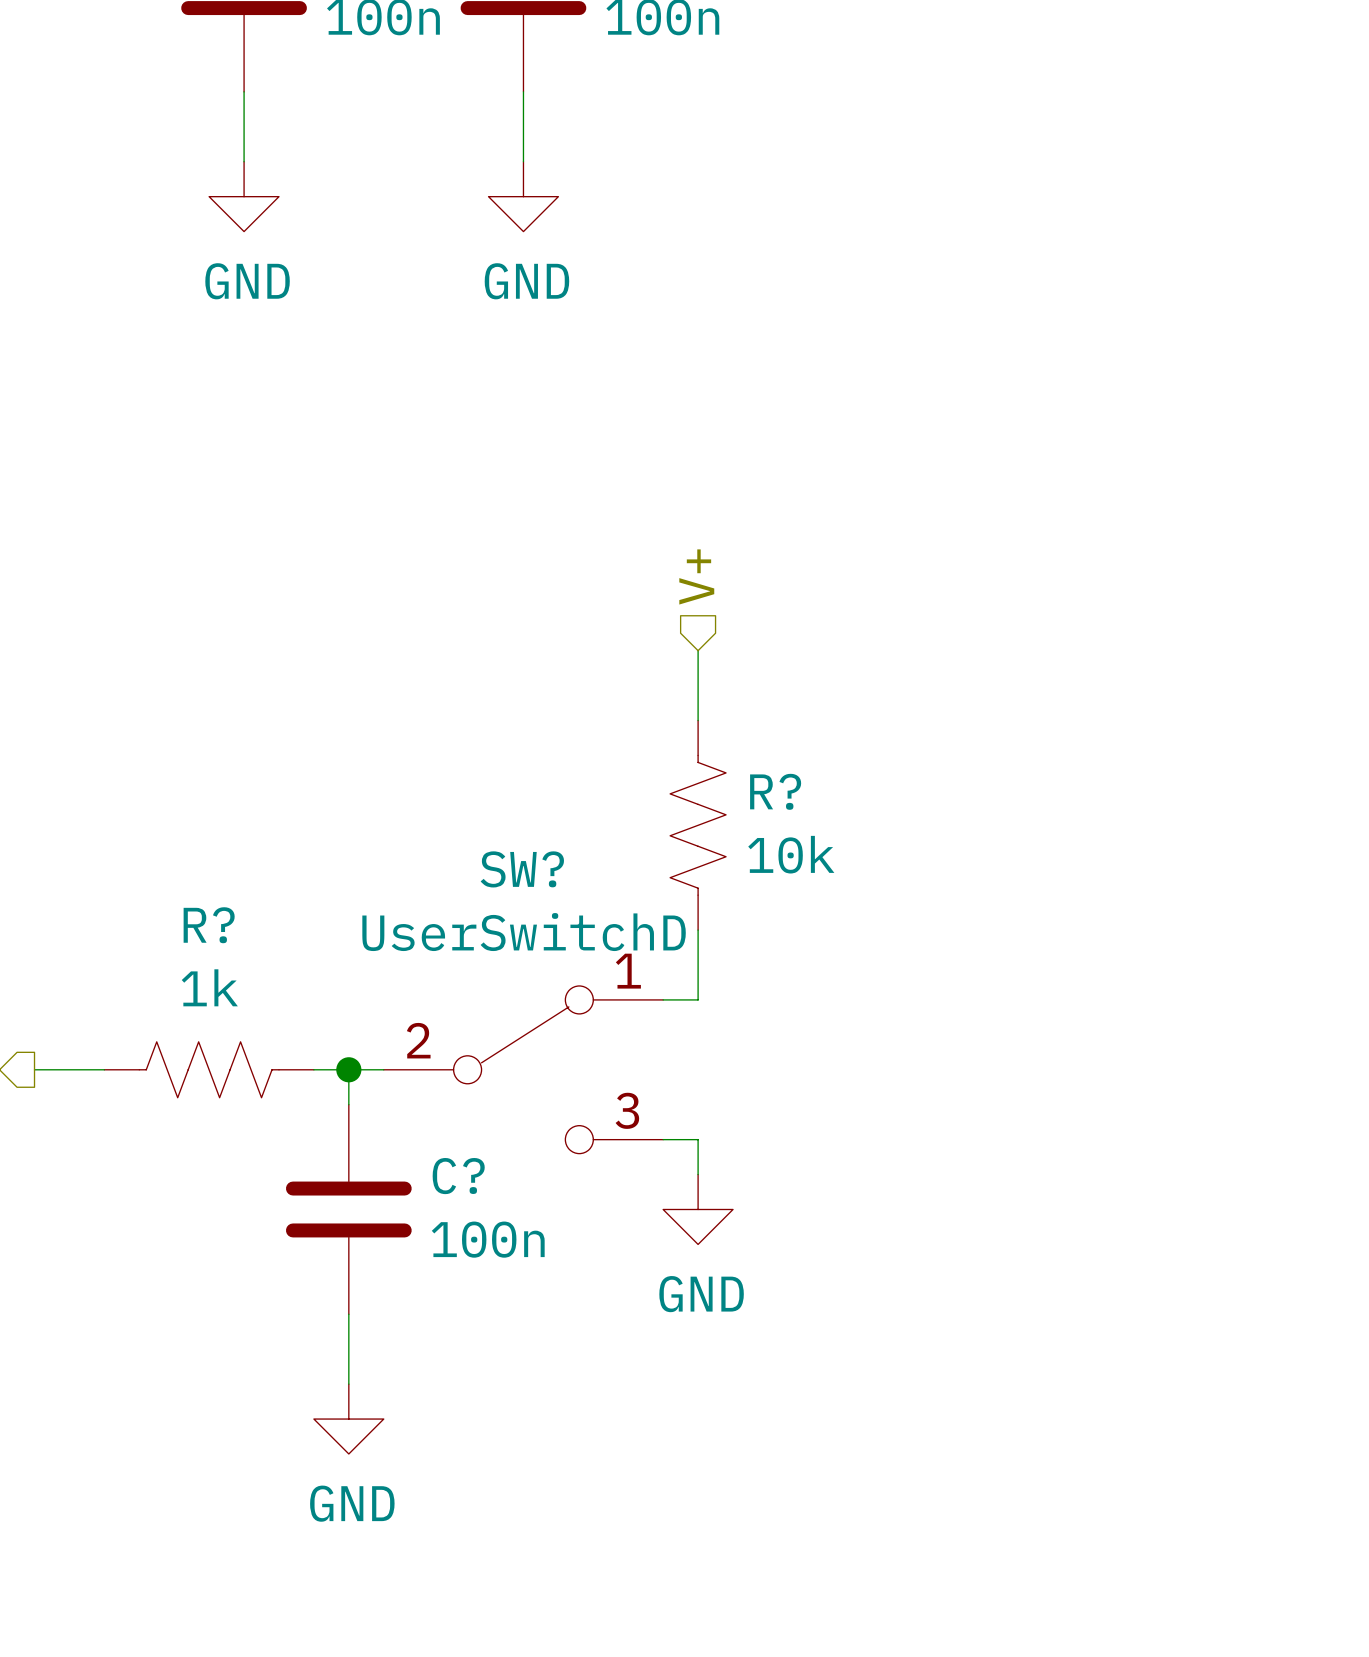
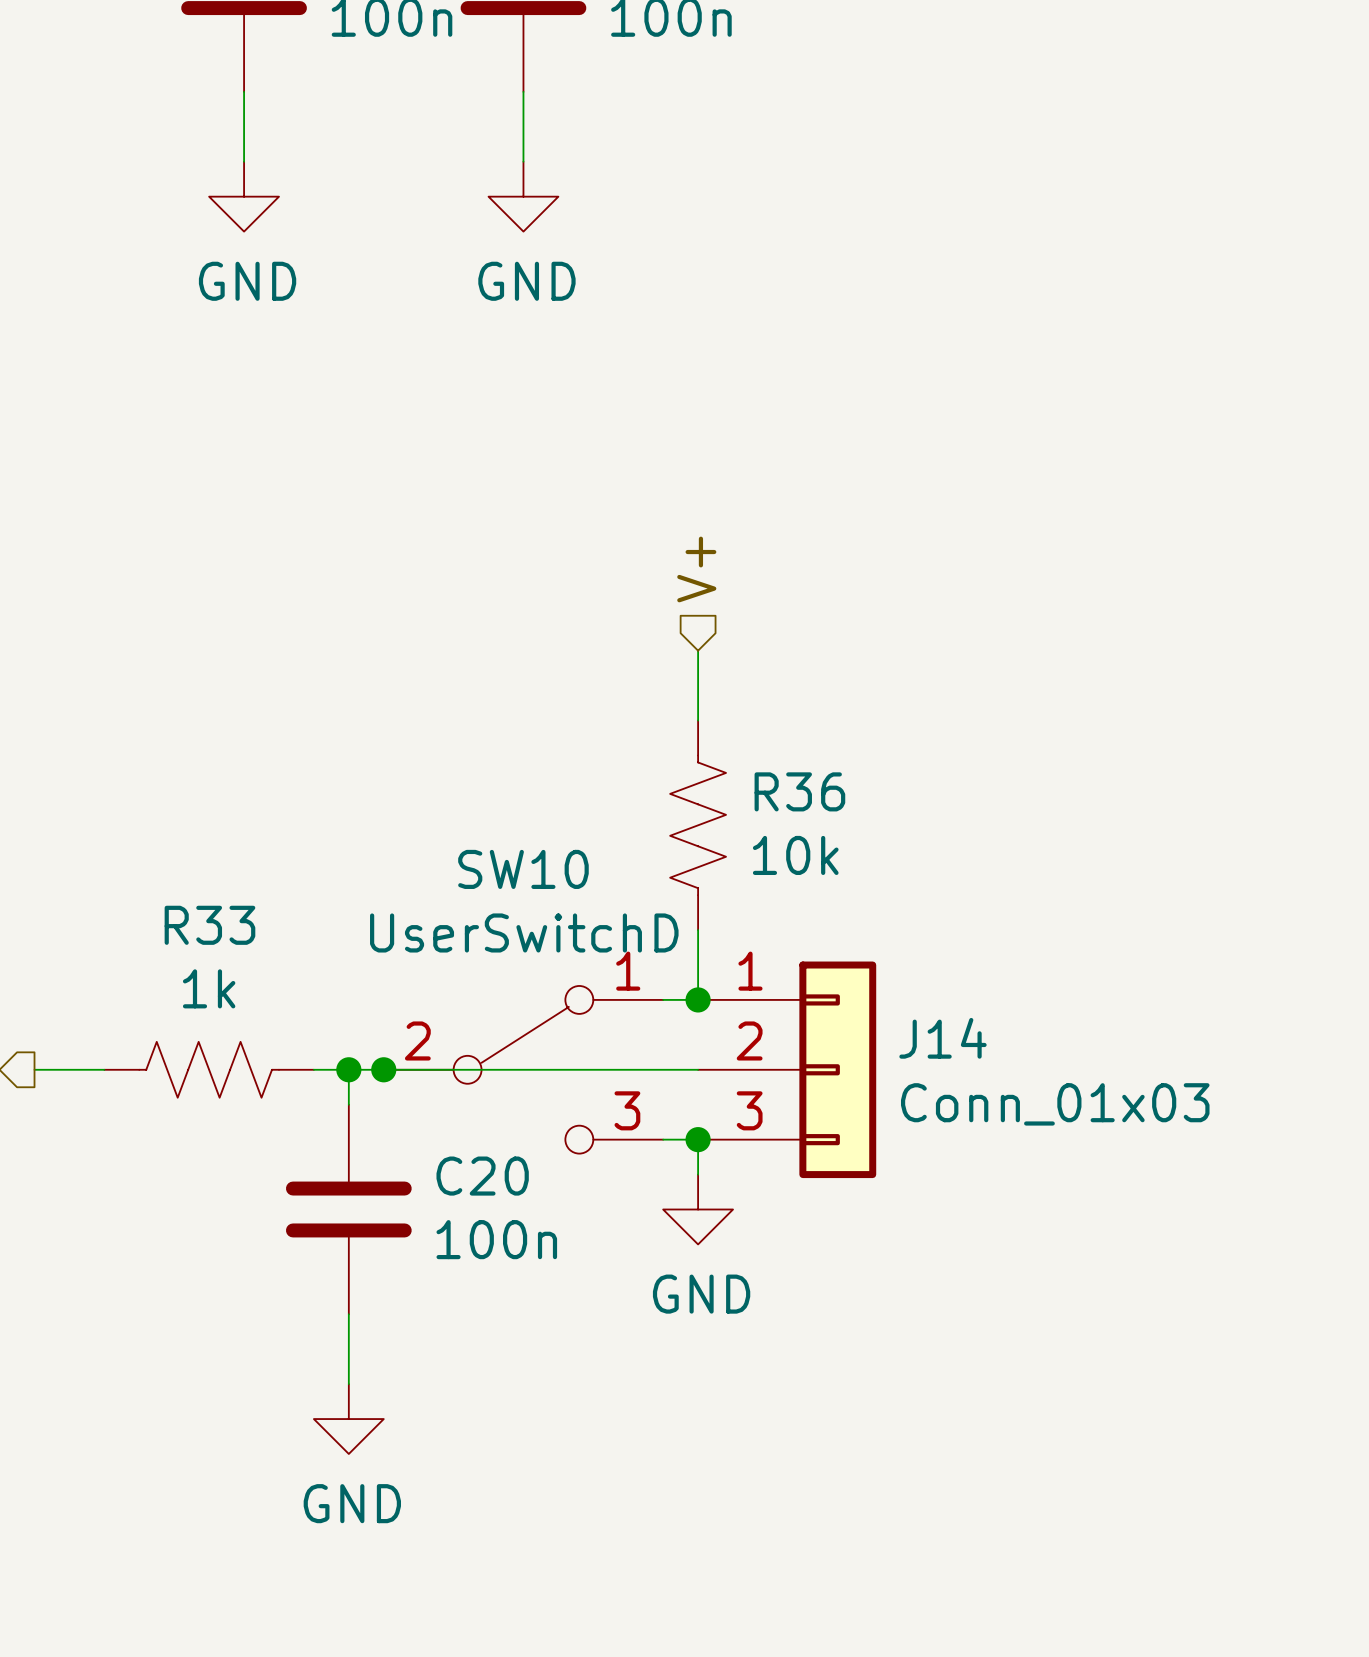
R? name: R? (775, 791) -> R36 (799, 791)
SW? name: SW? (522, 869) -> SW10 (523, 869)
R? name: R? (209, 925) -> R33 (209, 925)
junction: none -> (698, 999)
wire: none -> (383, 1069) (698, 1069)
junction: none -> (383, 1069)
J14: none -> Conn_01x03 (787, 1069)
junction: none -> (698, 1139)
C? name: C? (458, 1176) -> C20 (482, 1176)

